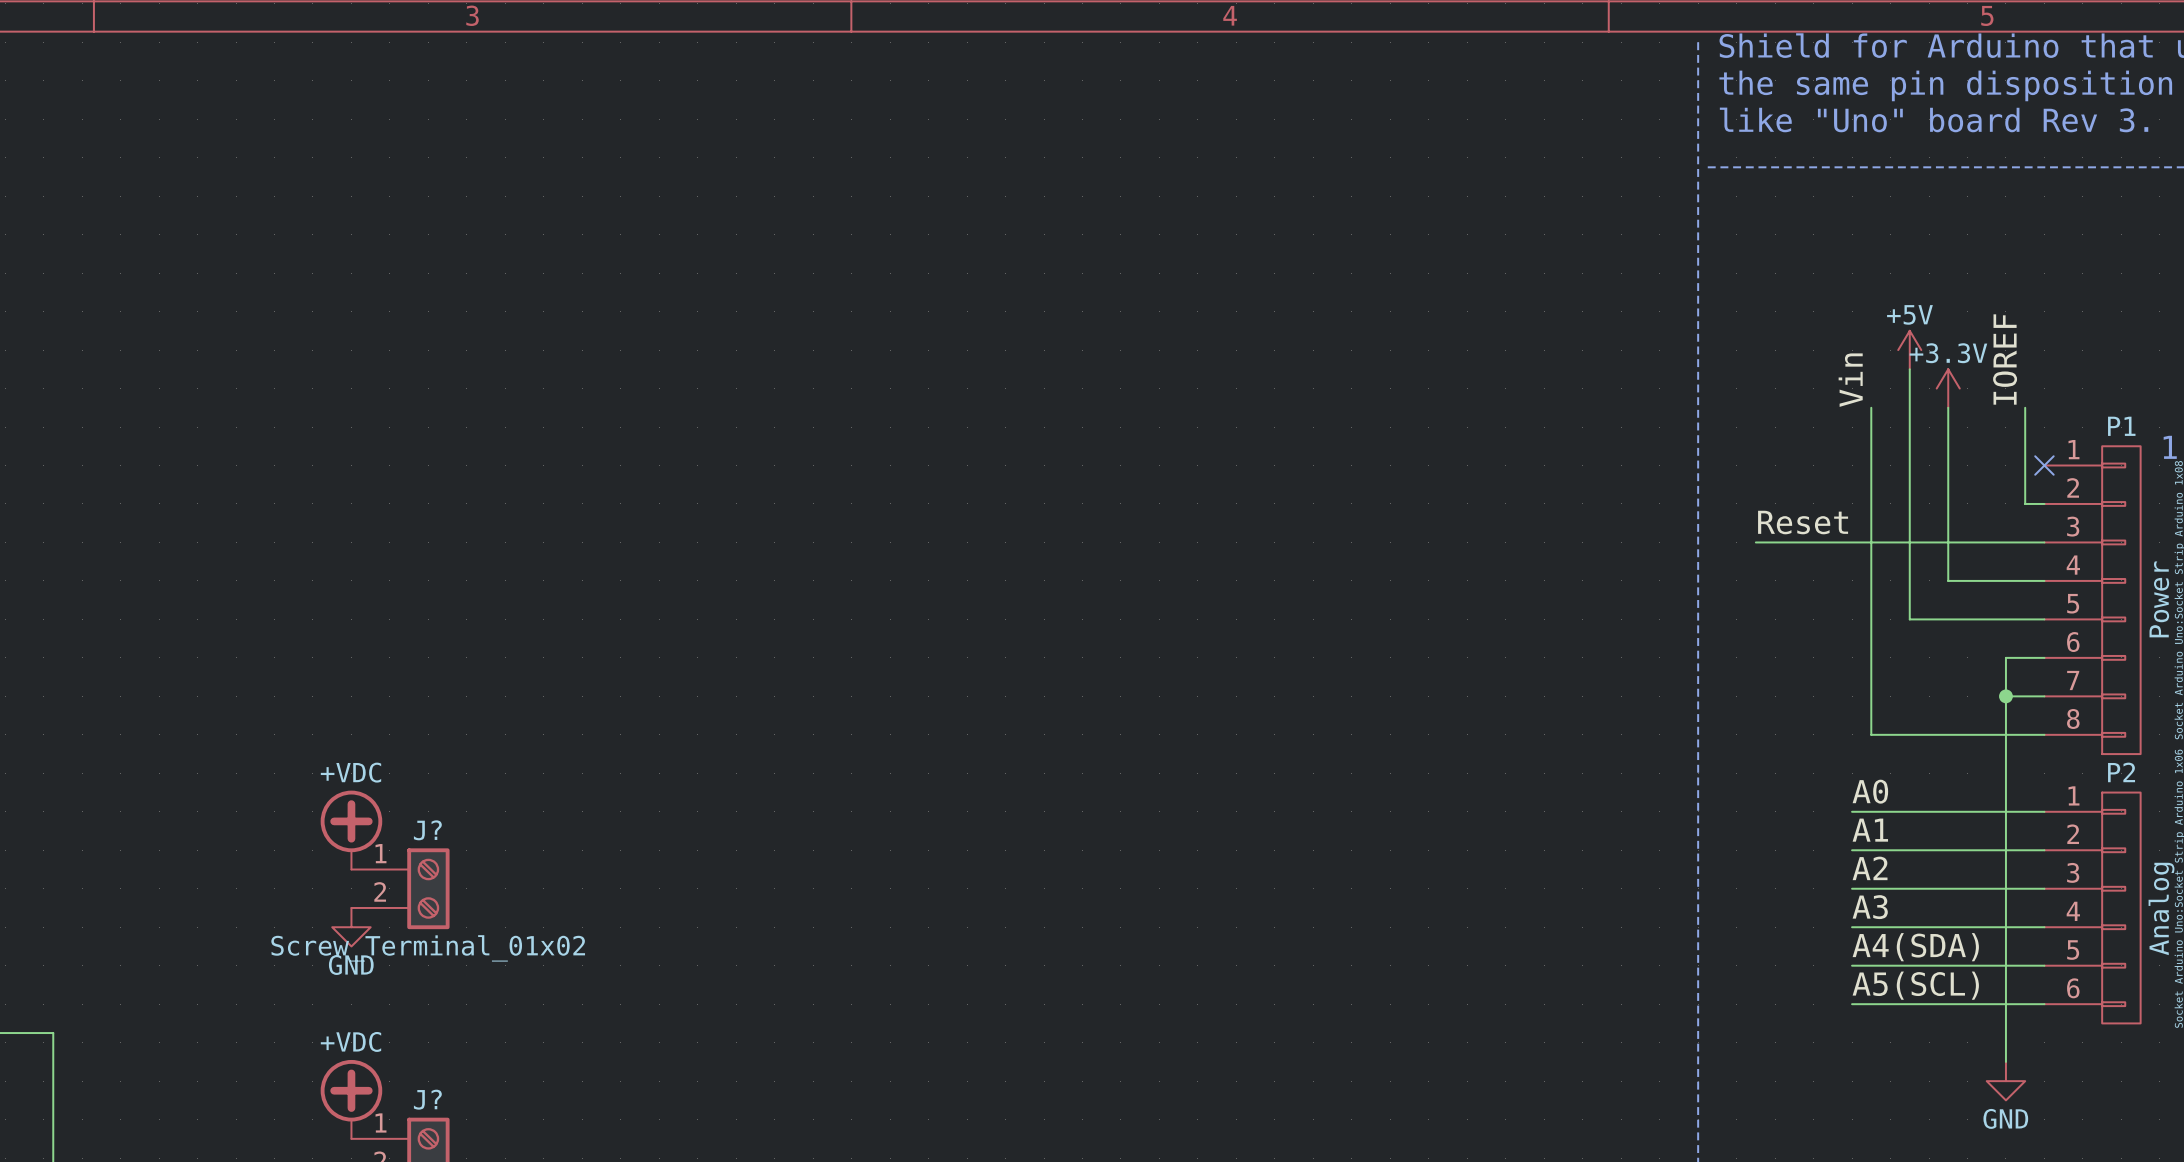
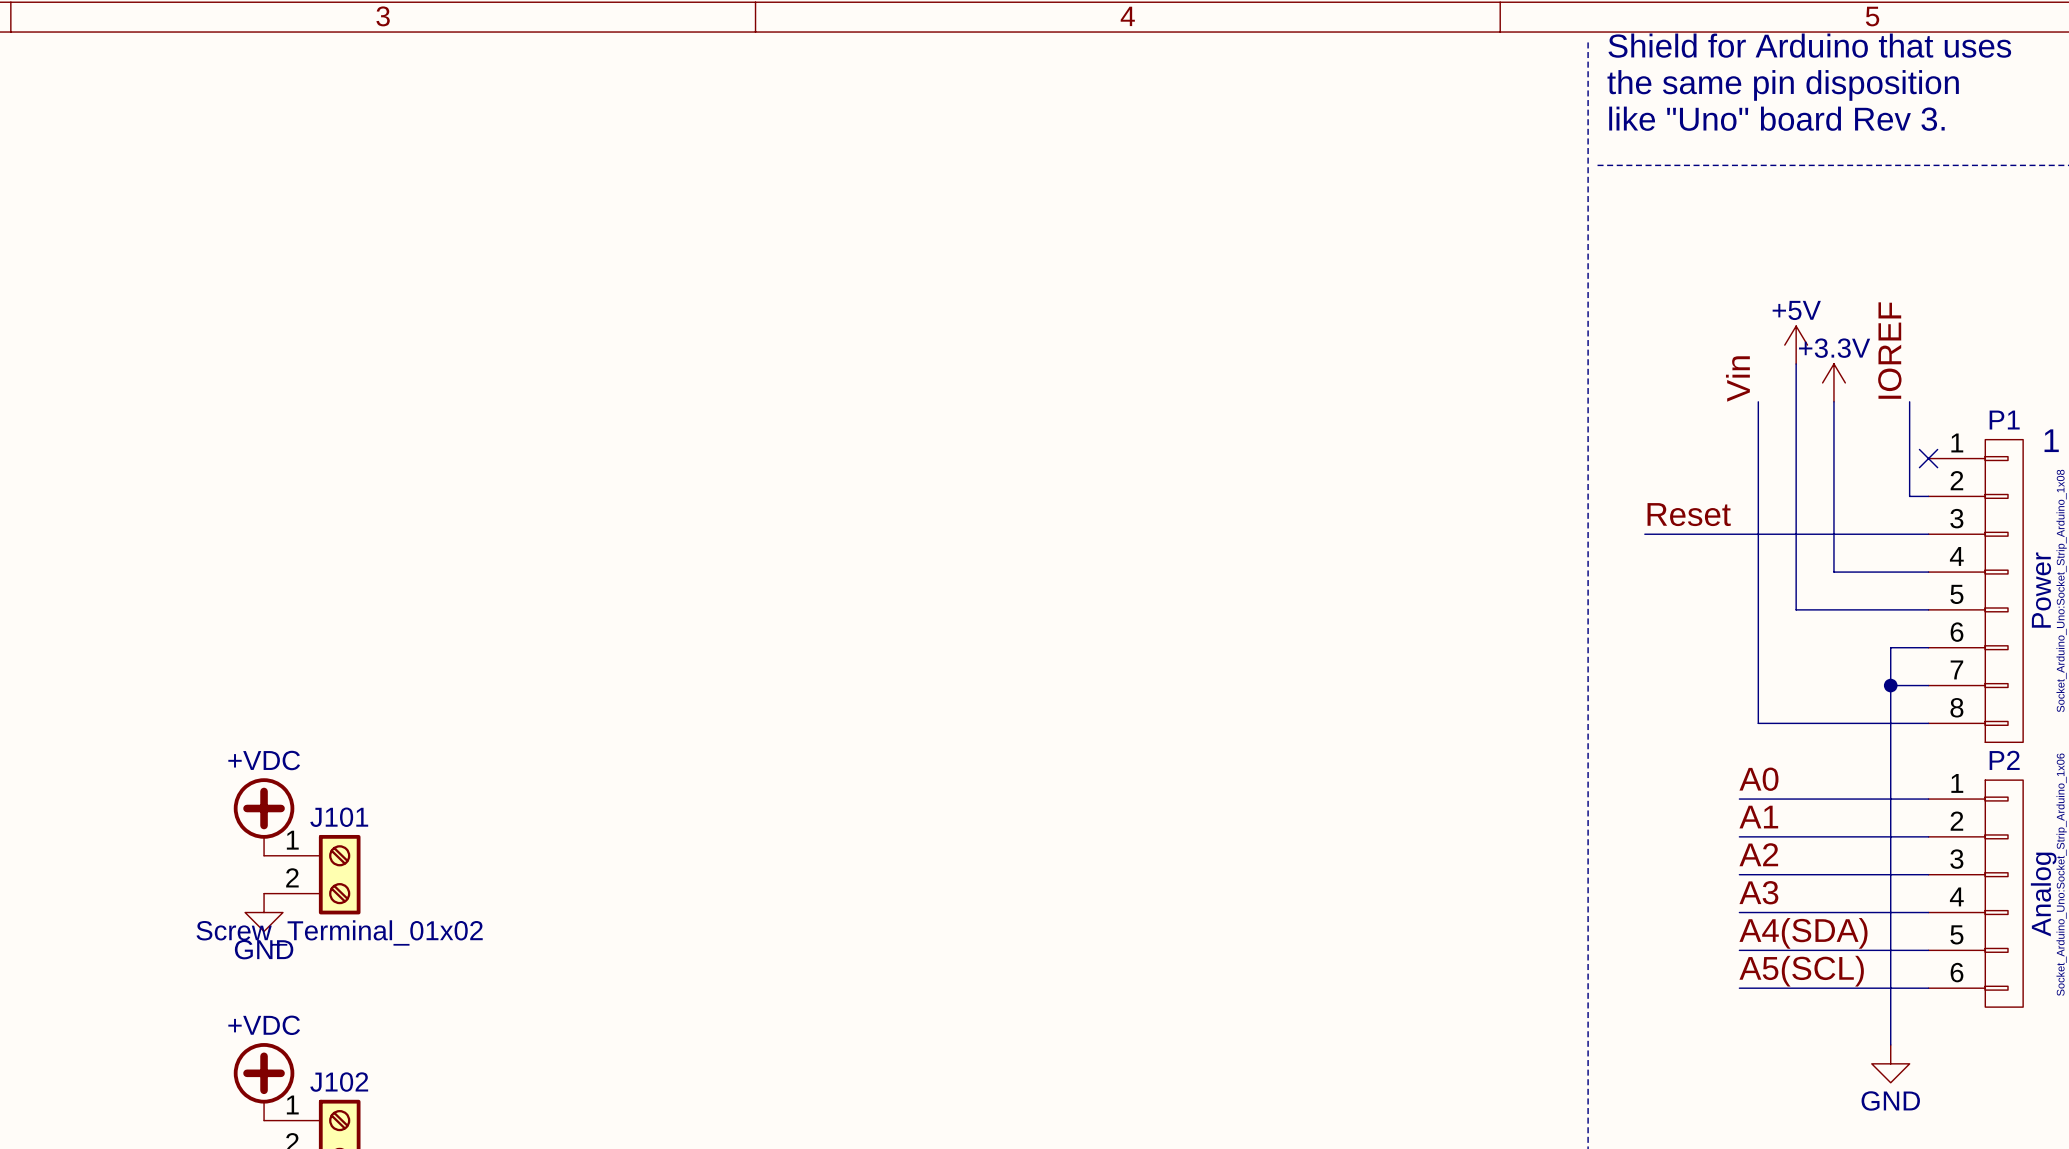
J? name: J? (427, 830) -> J101 (339, 817)
J? name: J? (427, 1099) -> J102 (339, 1082)

